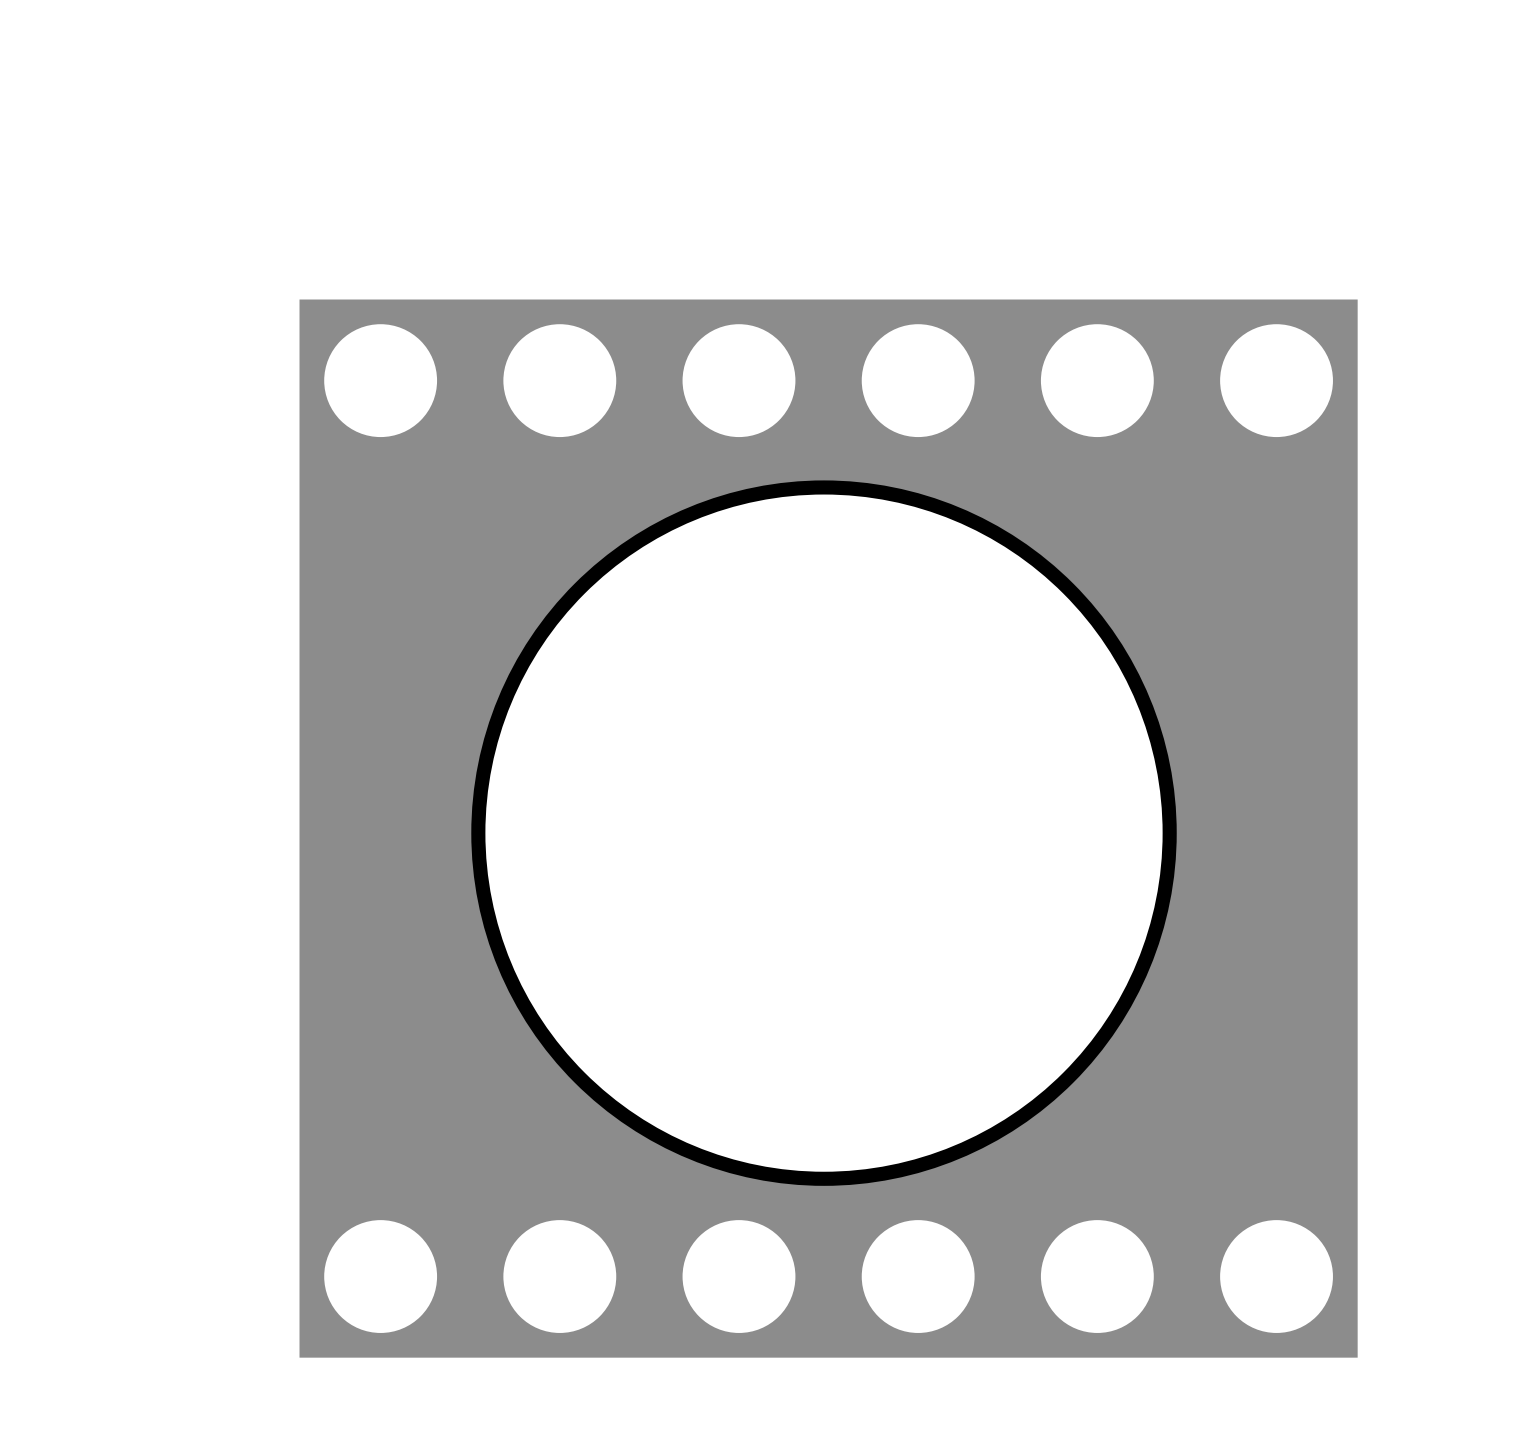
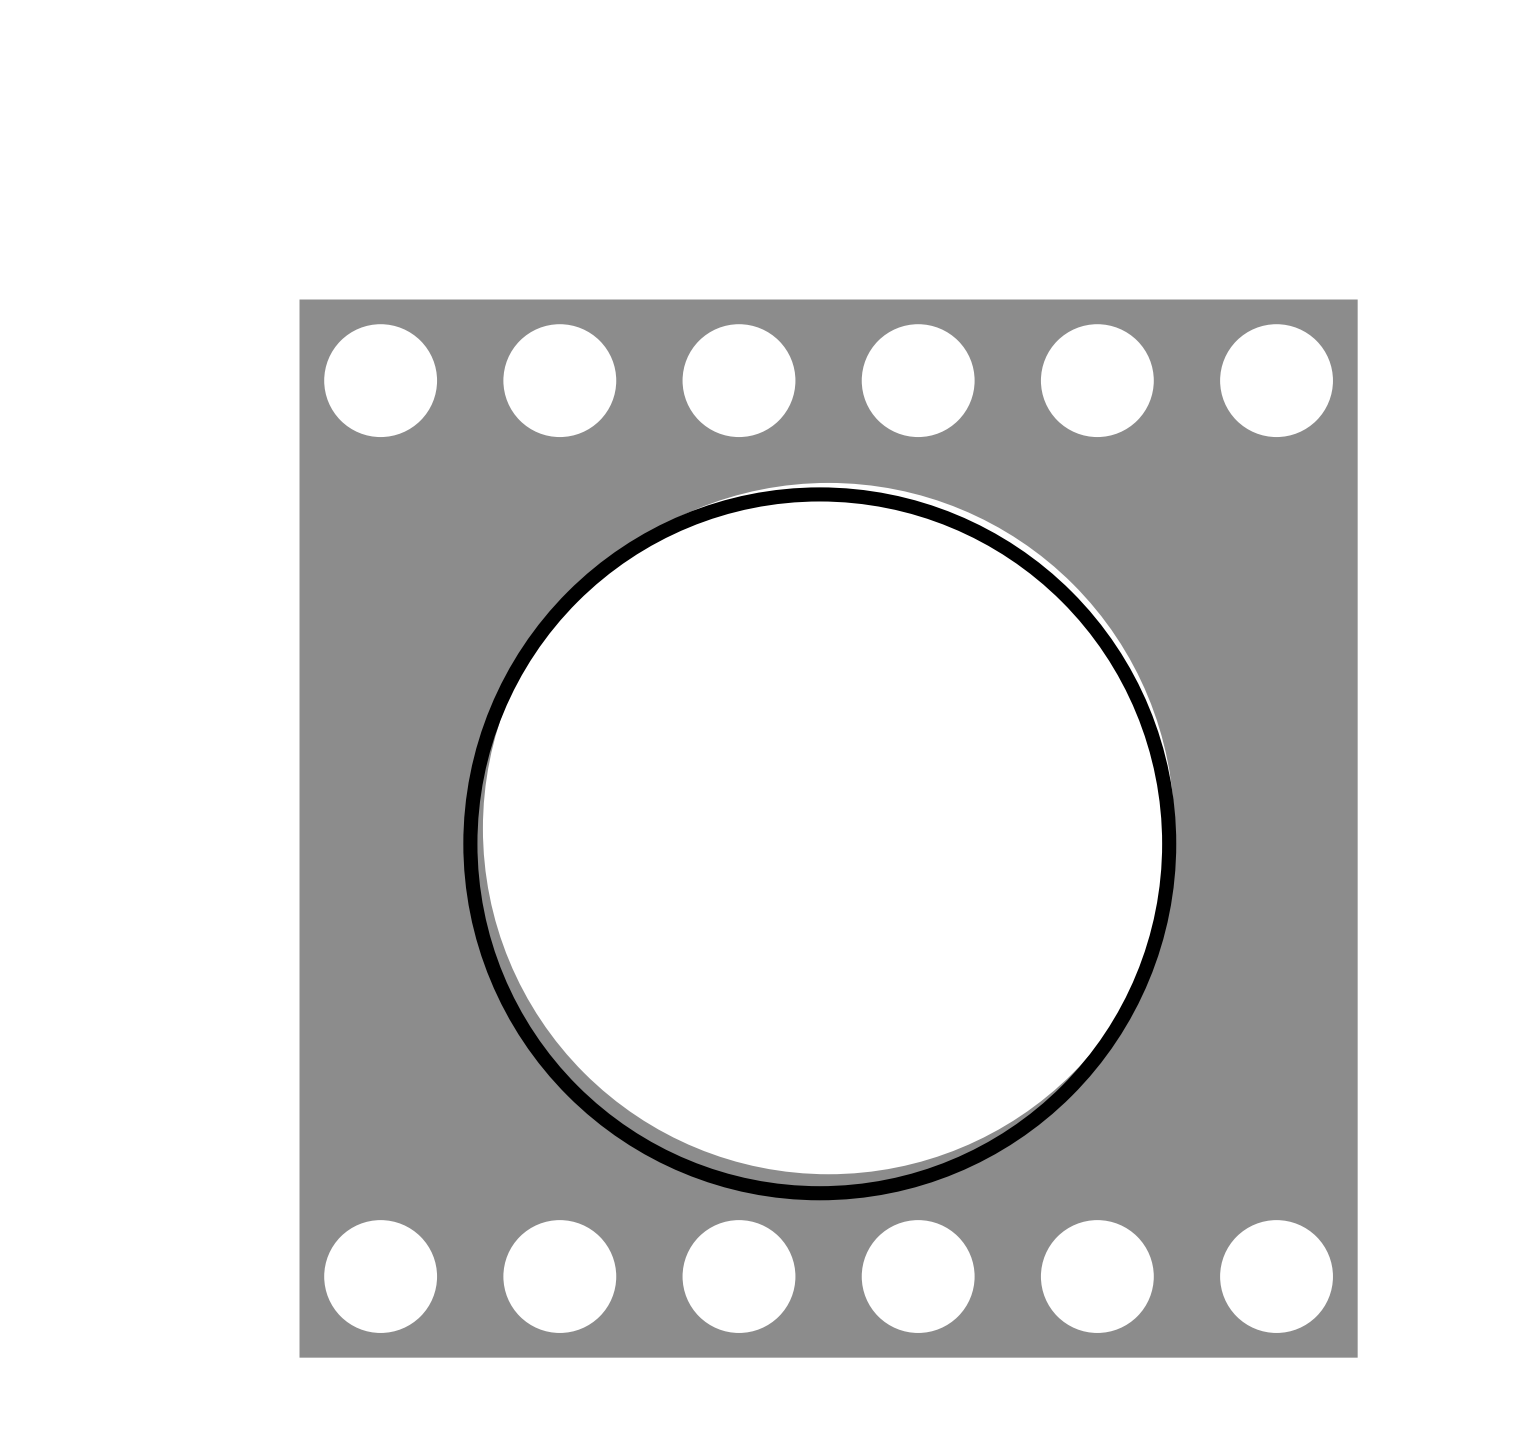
round board edge size: [471, 480, 1177, 1186] -> [463, 487, 1177, 1201]

